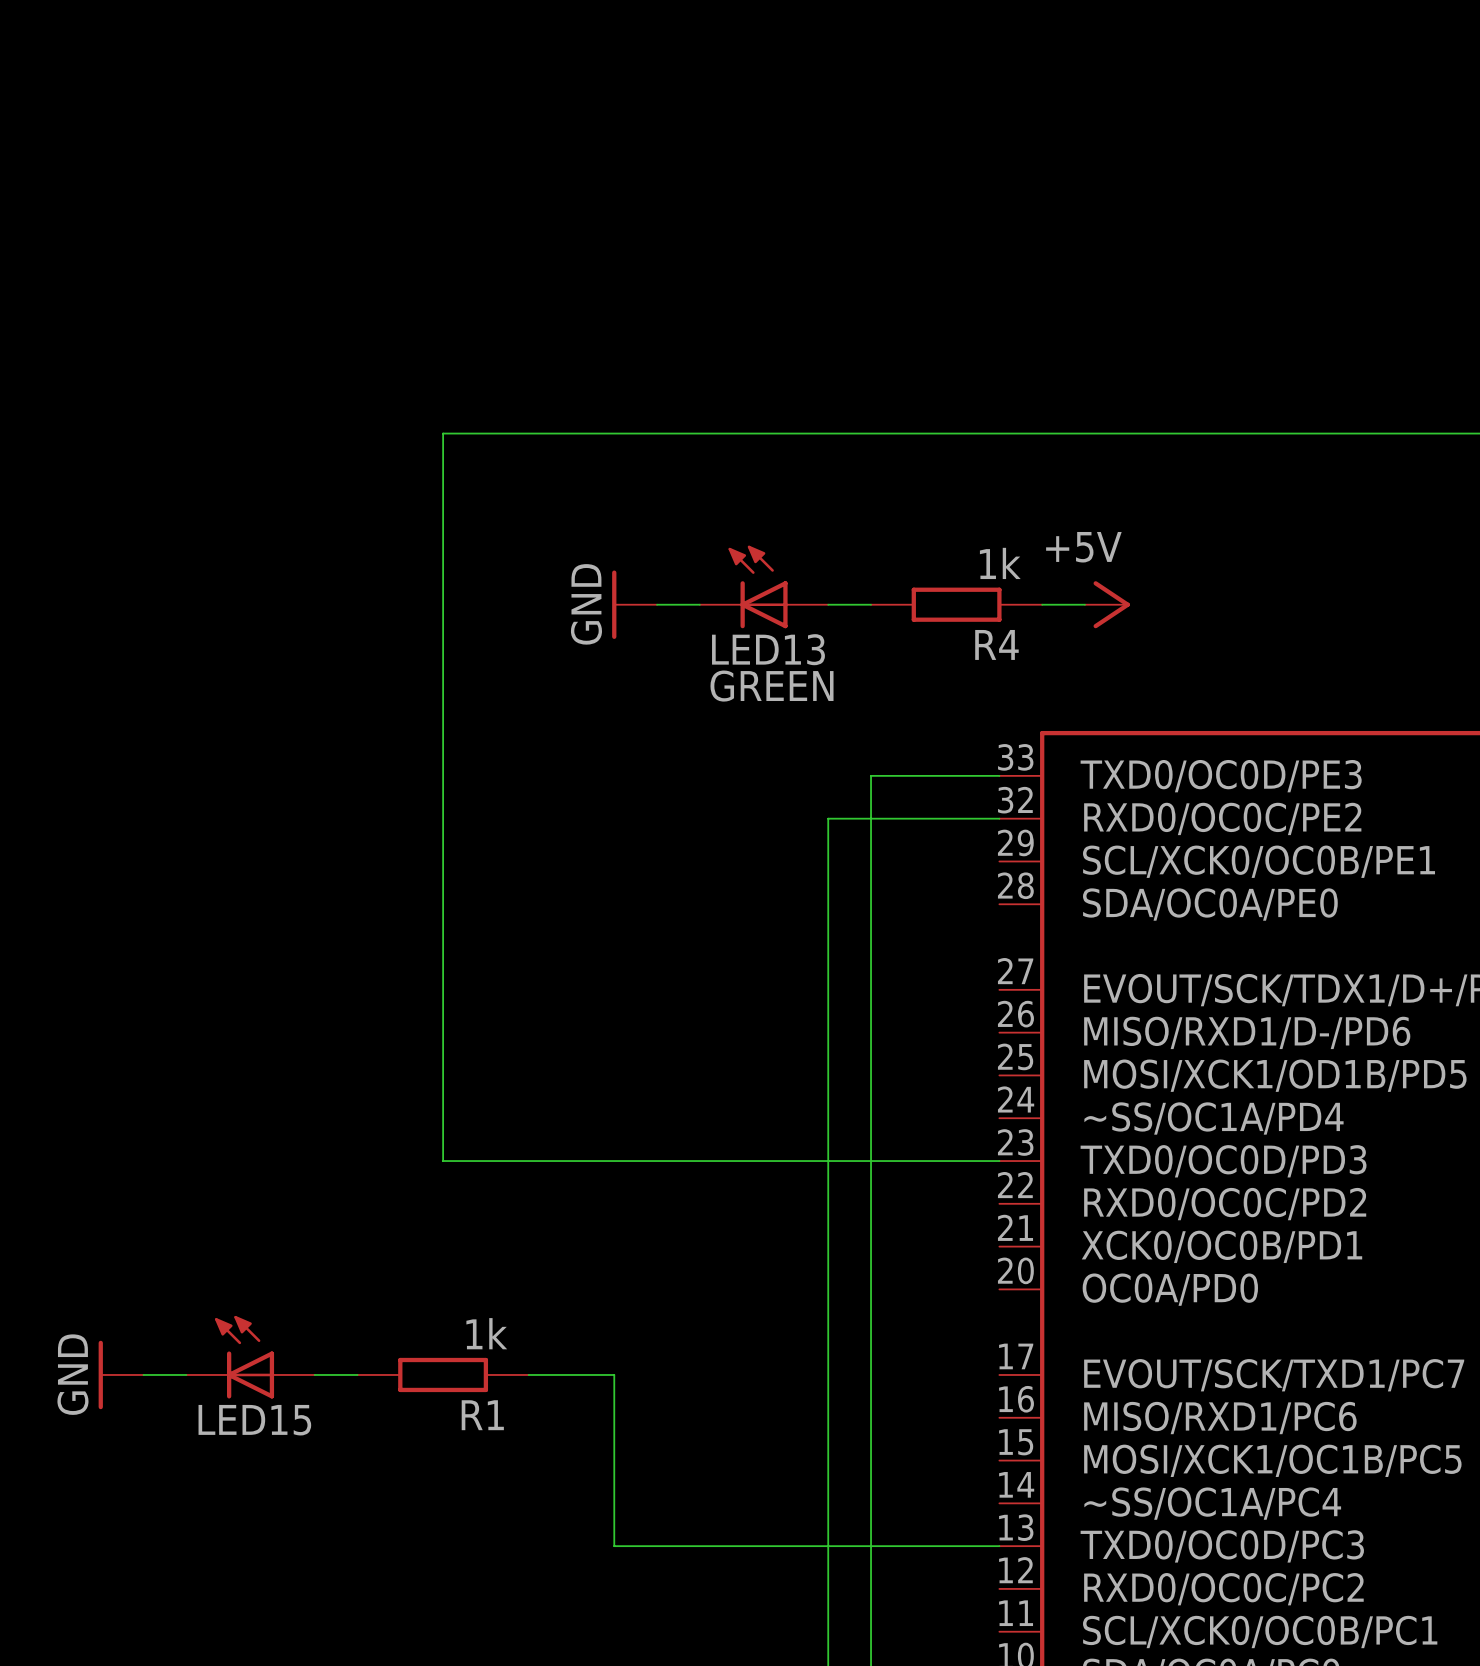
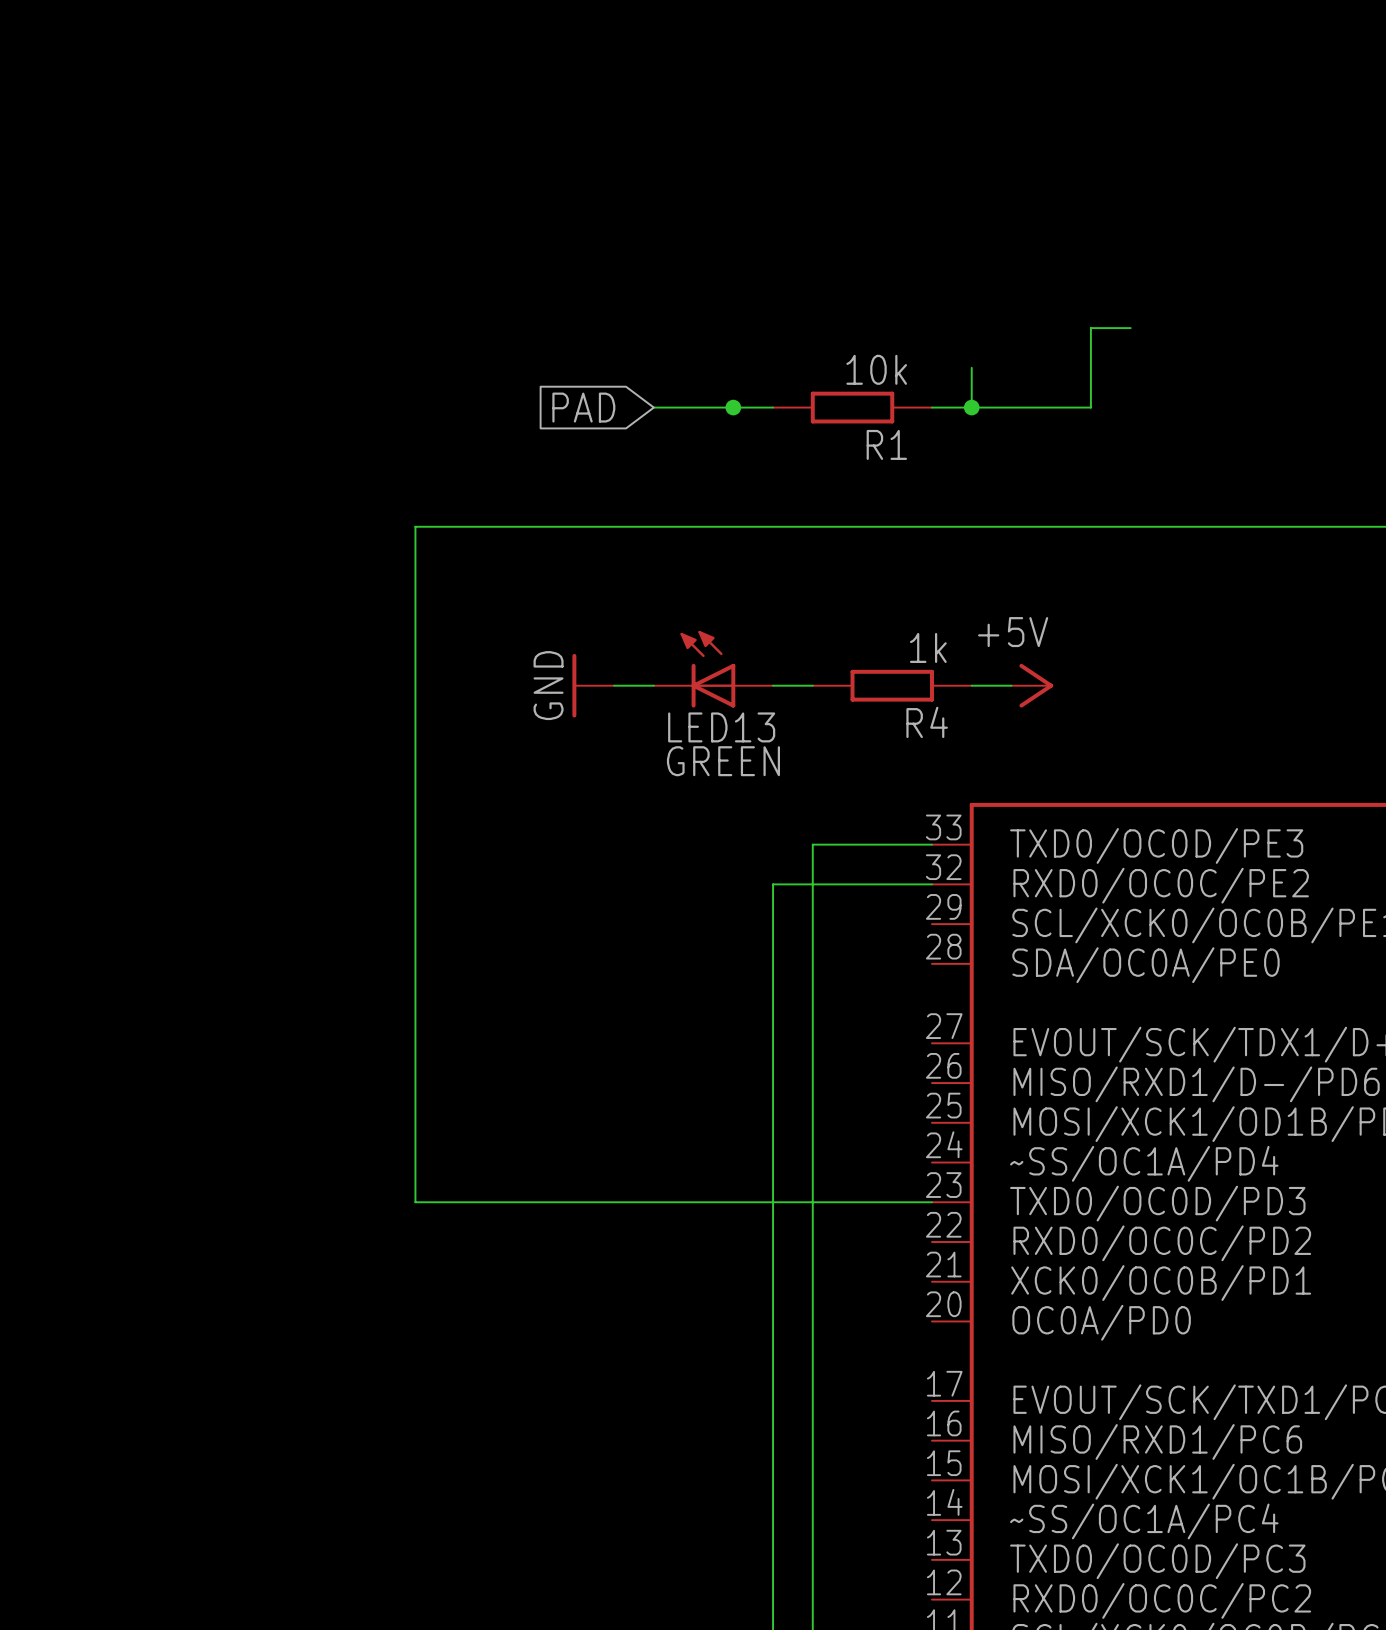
wire: none -> (1130, 328) (1090, 328) (1090, 407) (931, 407)
wire: none -> (971, 367) (971, 407)
global label: none -> PAD (583, 407)
wire: none -> (653, 407) (773, 407)
junction: none -> (733, 407)
junction: none -> (971, 407)
R1 value: 1k (486, 1333) -> 10k (876, 369)
LED15: (250, 1357) -> none
power symbol: GND (121, 1374) -> none
wire: (143, 1374) (186, 1374) -> none
wire: (314, 1374) (357, 1374) -> none
R1 position: (443, 1374) -> (852, 407)
wire: (528, 1374) (614, 1374) (614, 1546) (999, 1546) -> none

